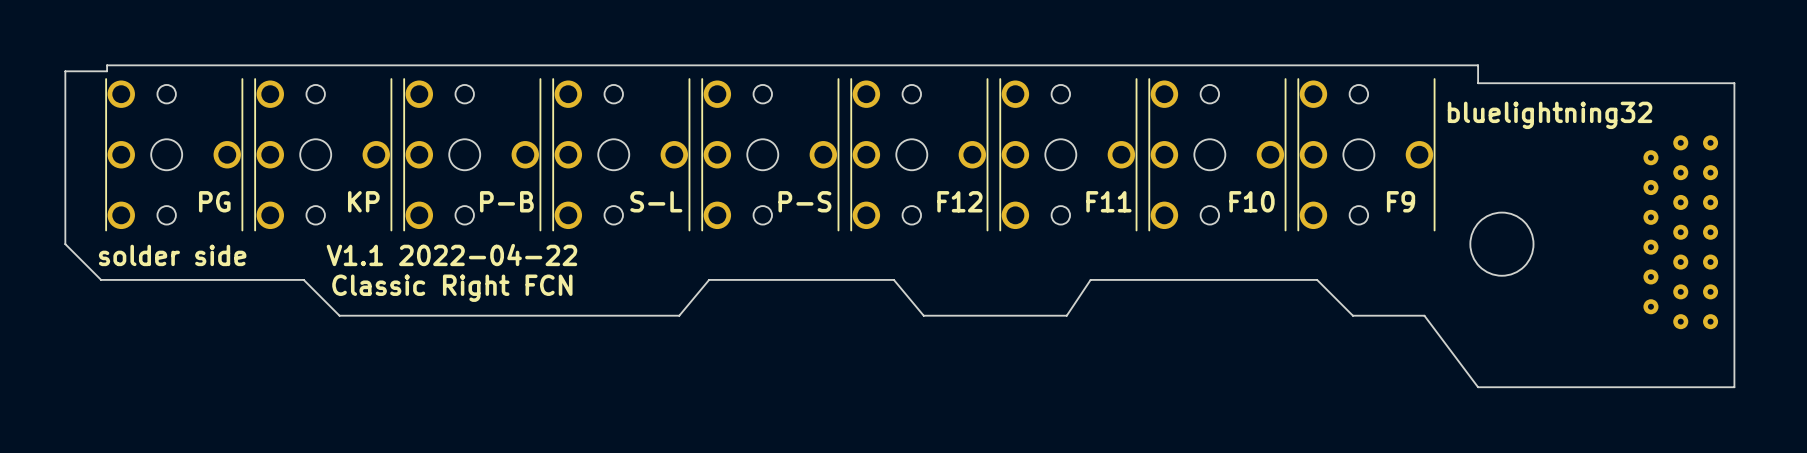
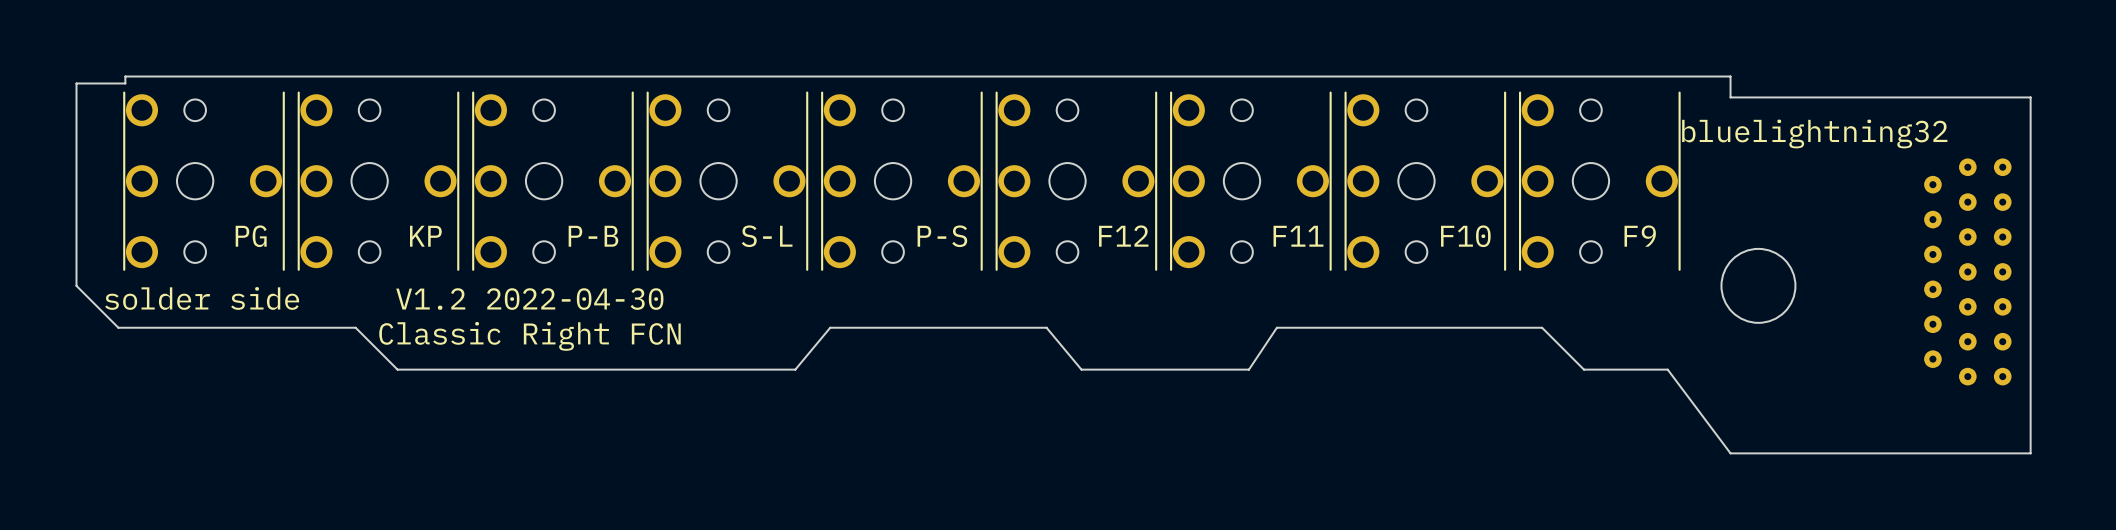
text: V1.1 2022-04-22 (451, 255) -> V1.2 2022-04-30 (529, 299)

